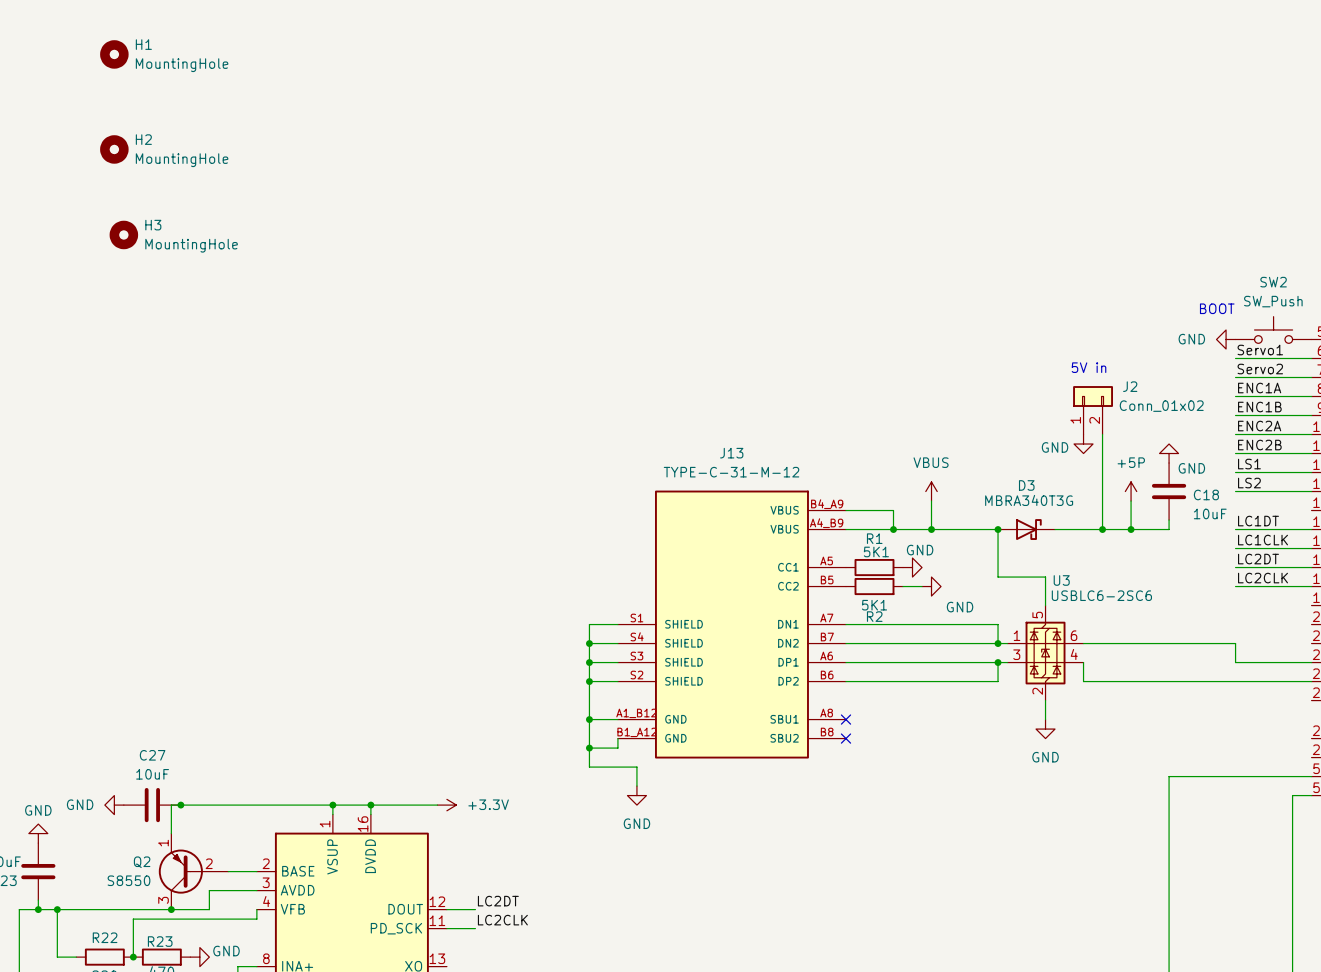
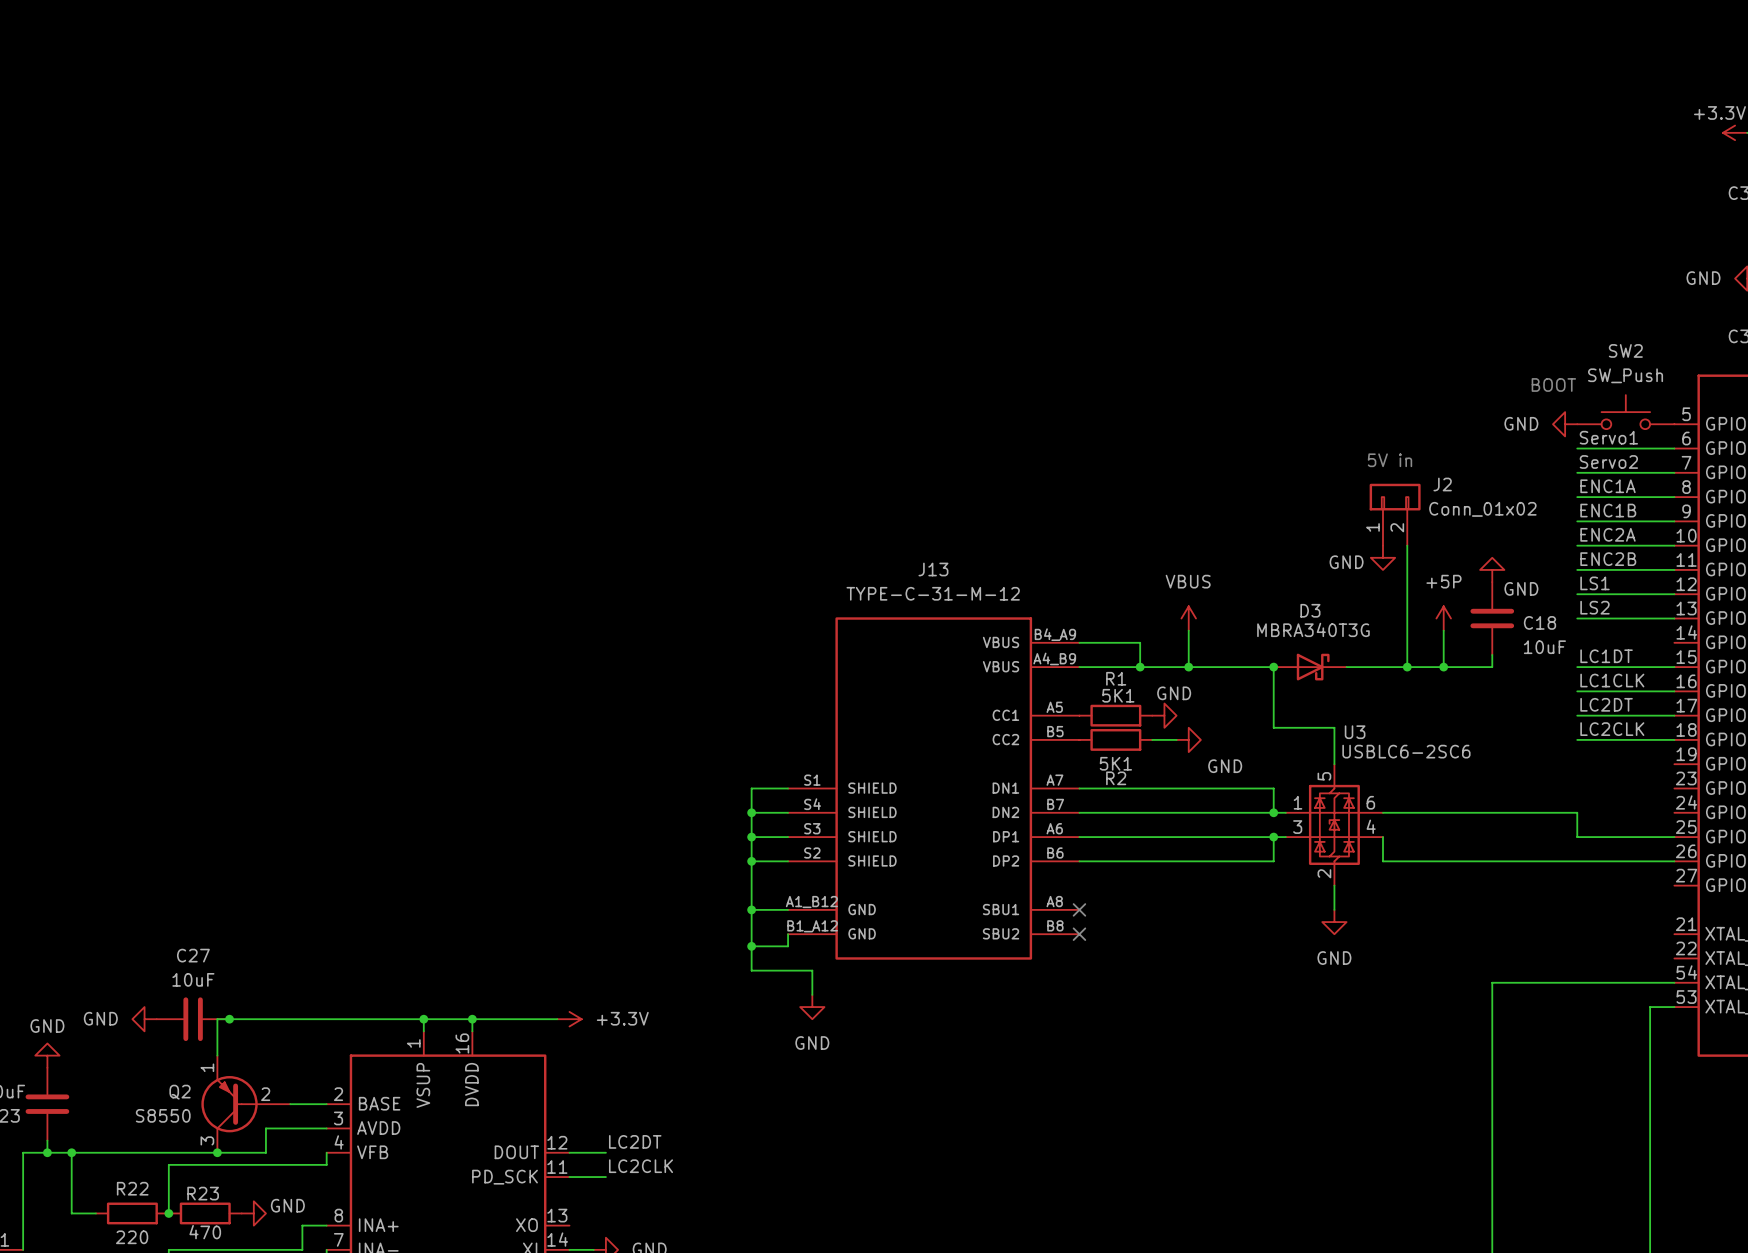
H1: MountingHole (114, 54) -> none
H2: MountingHole (114, 149) -> none
H3: MountingHole (123, 234) -> none

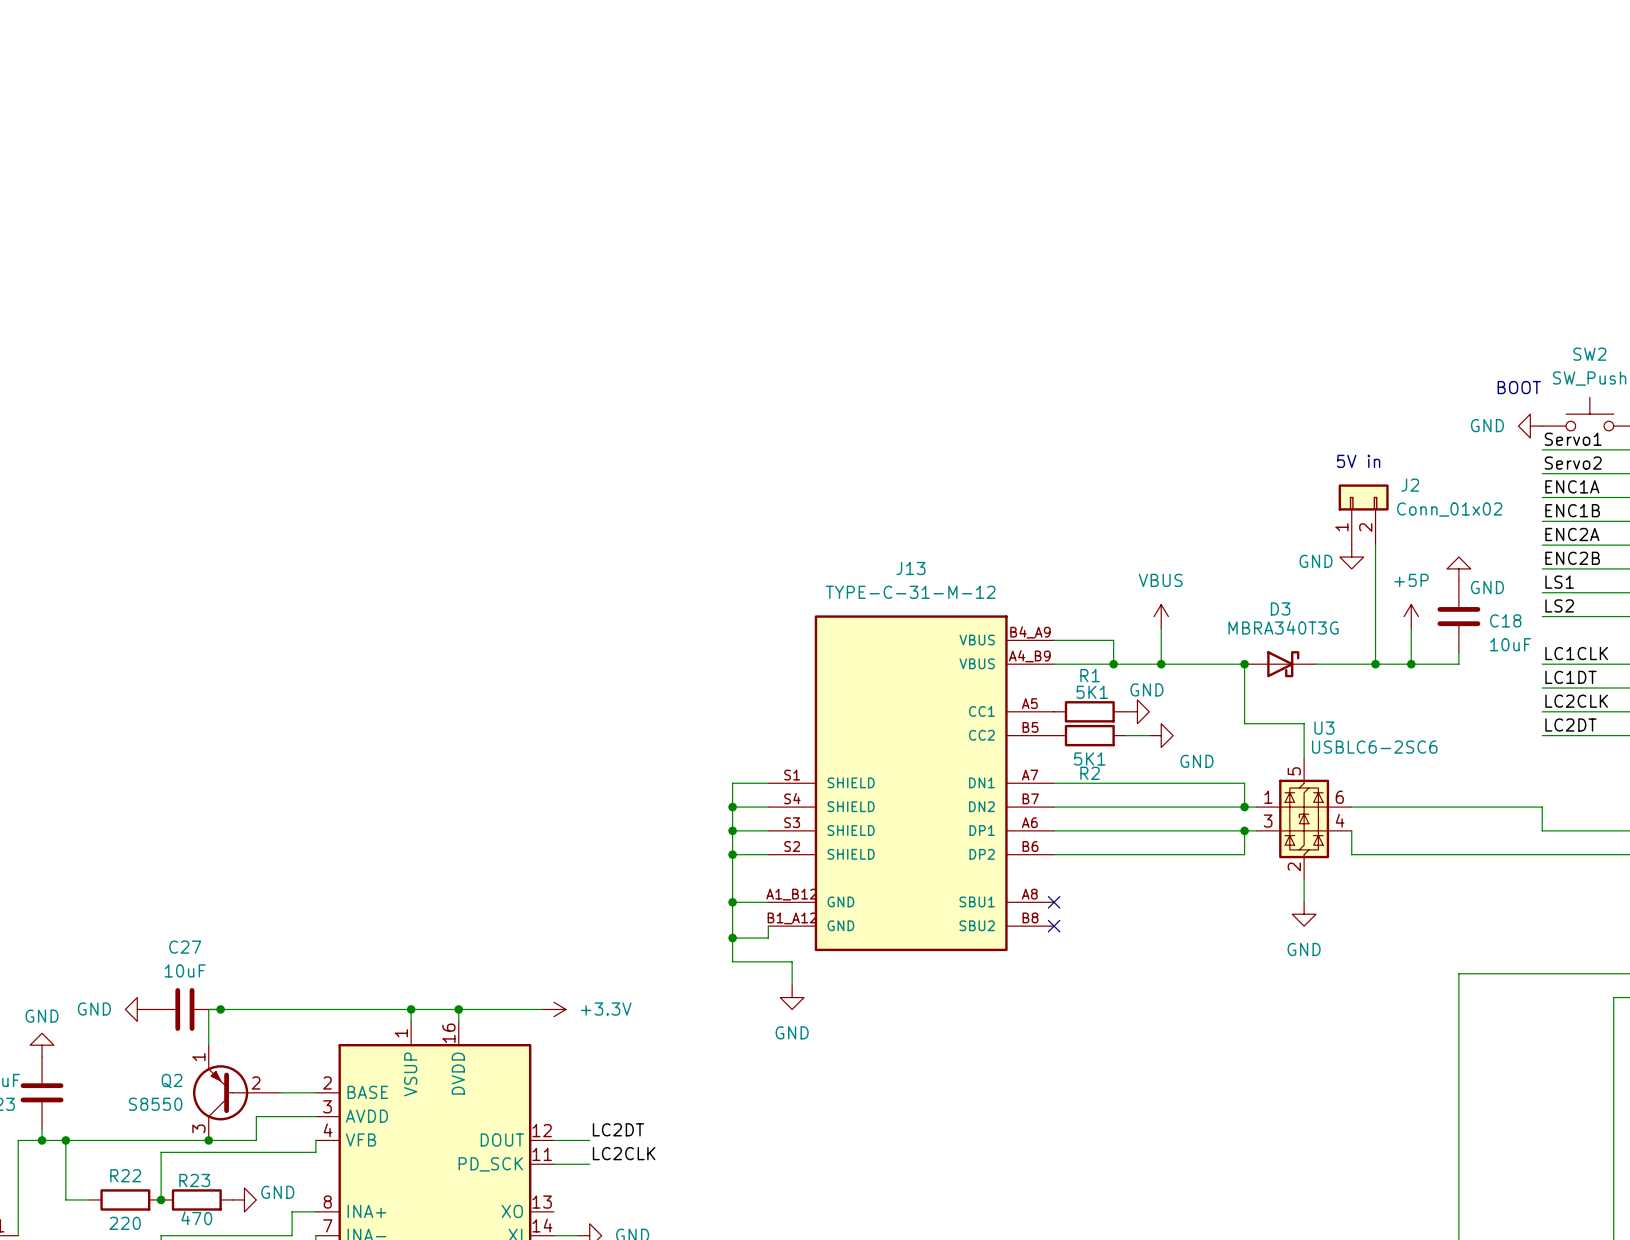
label: LC1DT (1606, 656) -> LC1CLK (1576, 653)
label: LC1CLK (1612, 680) -> LC1DT (1570, 677)
label: LC2DT (1606, 704) -> LC2CLK (1576, 701)
label: LC2CLK (1612, 729) -> LC2DT (1570, 725)

